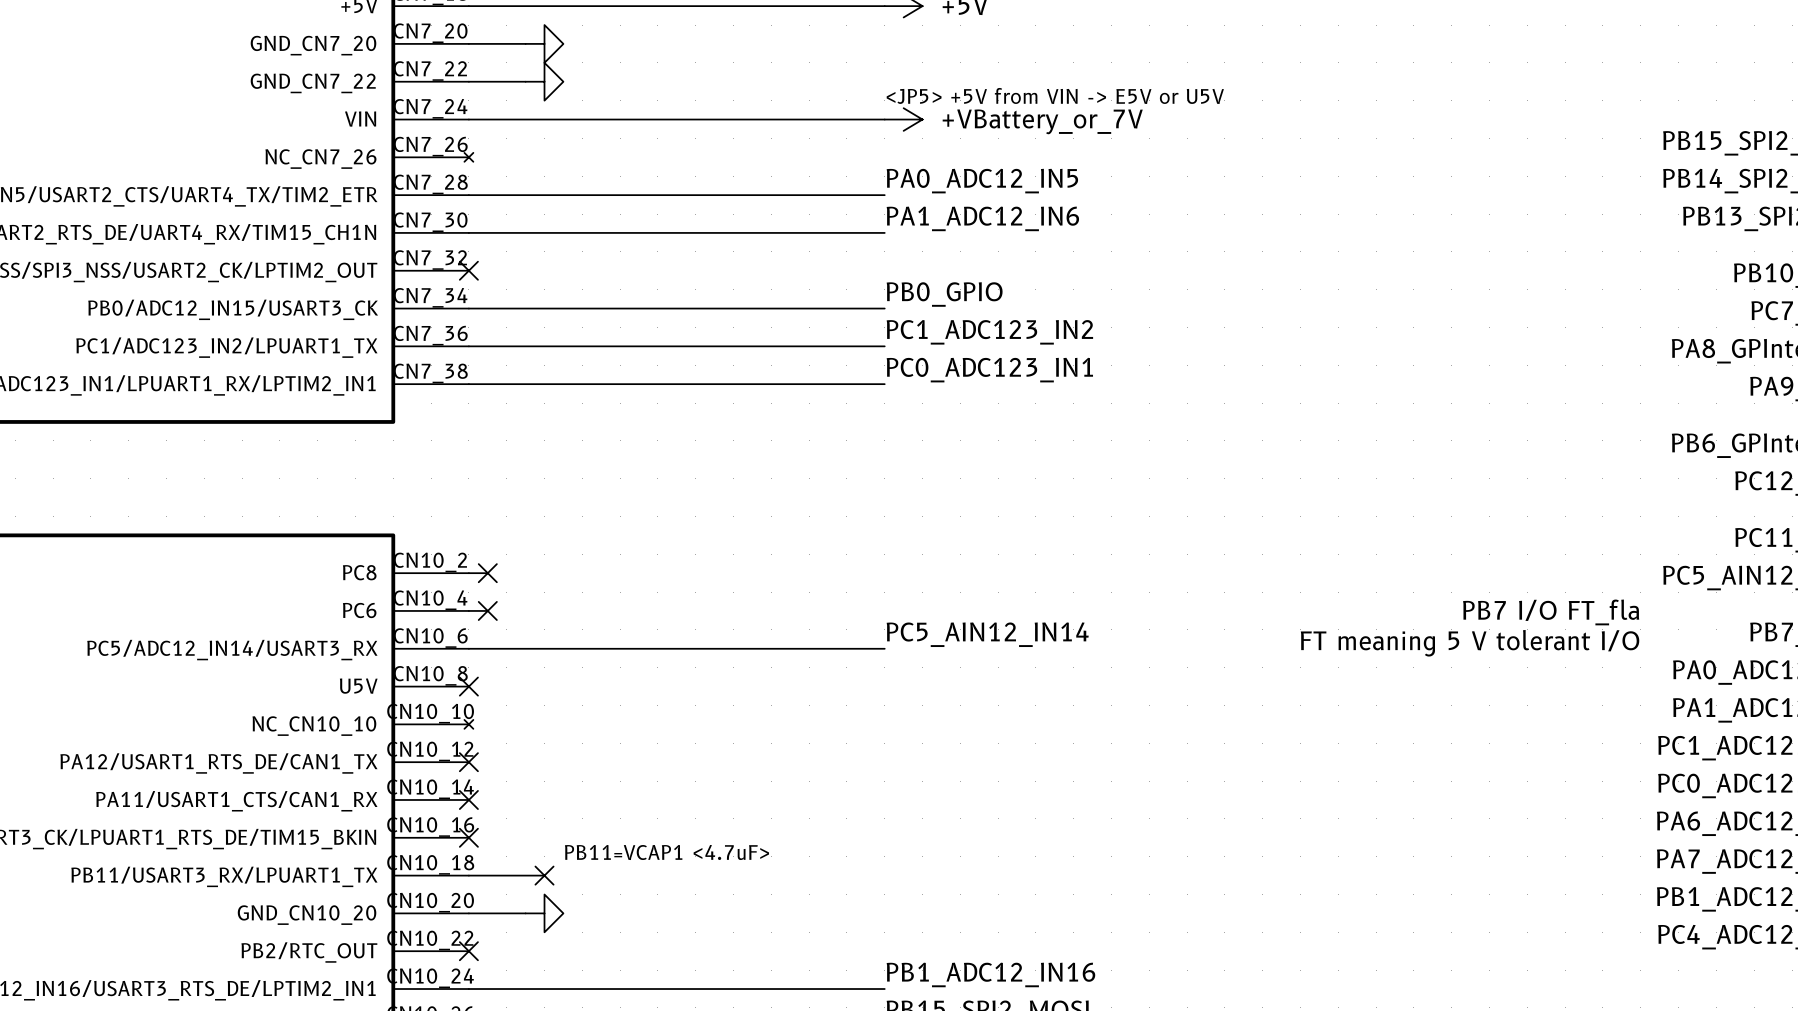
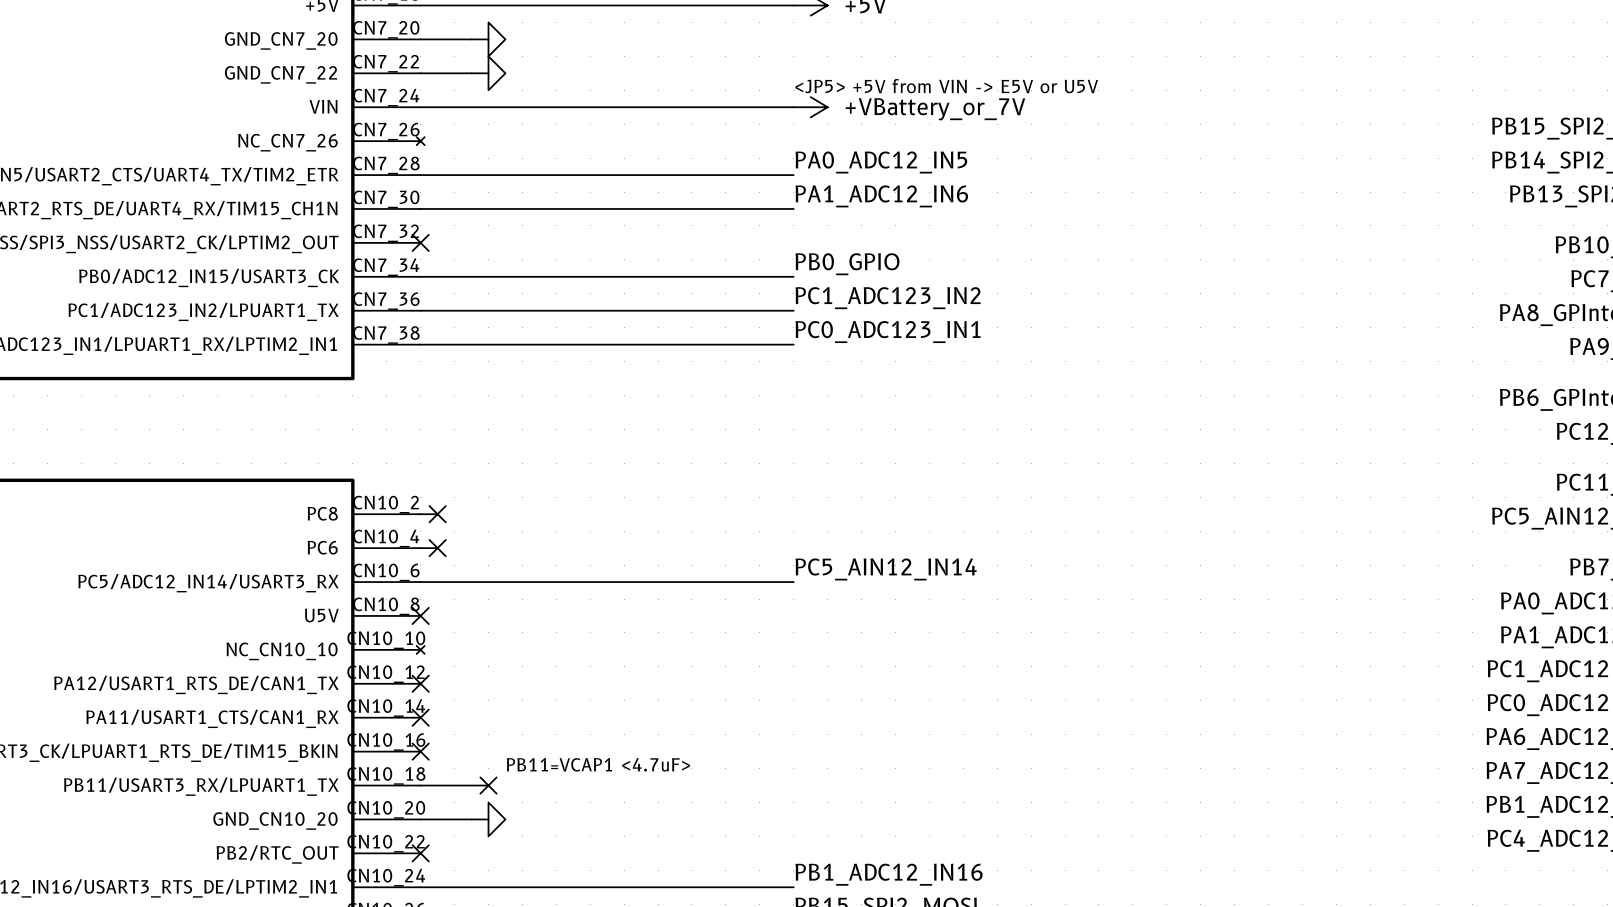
text: PB7 I/O FT_fla (1551, 612) -> none
text: FT meaning 5 V tolerant I/O (1470, 643) -> none

